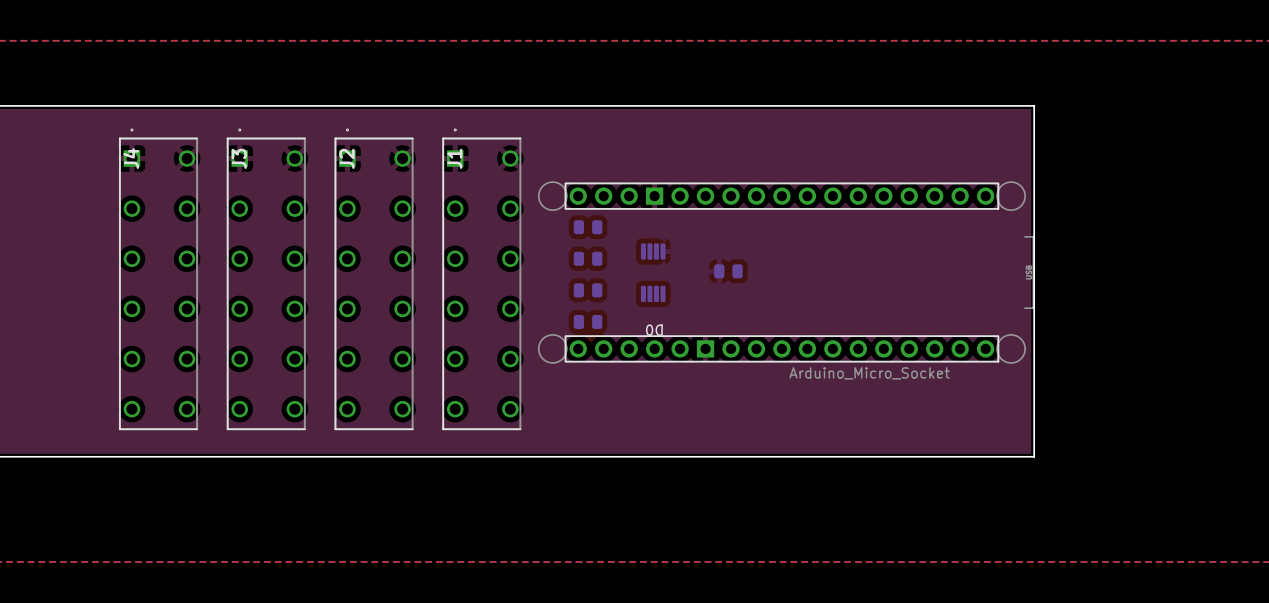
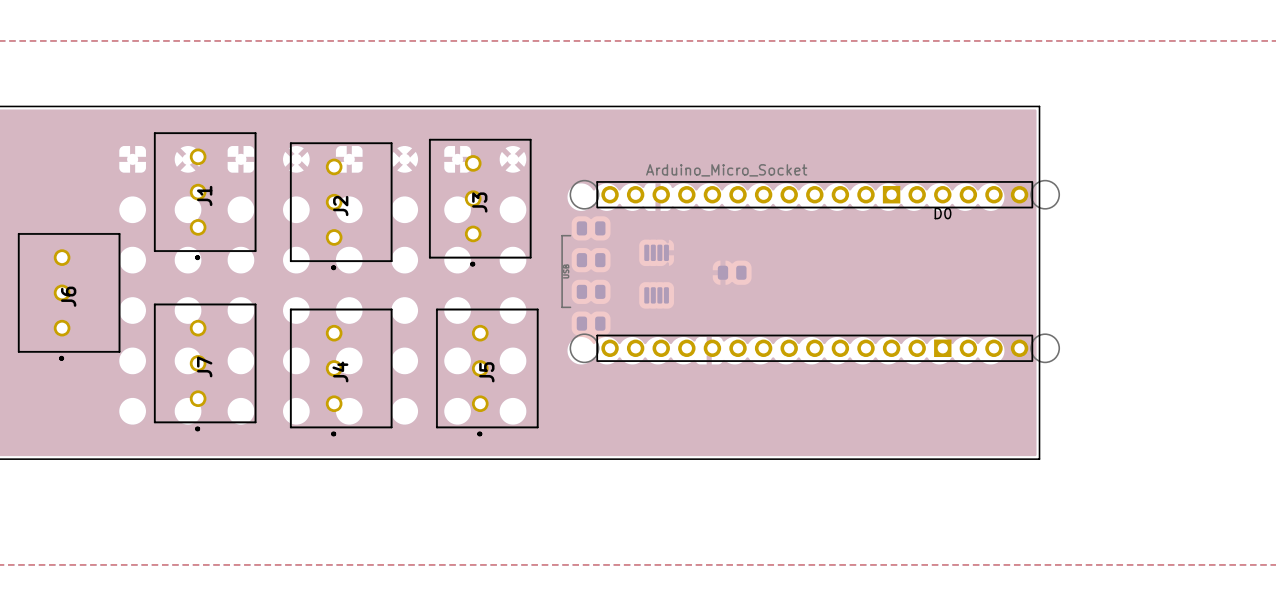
J4 footprint: [118, 128, 199, 431] -> [289, 308, 393, 437]
J3 footprint: [226, 128, 306, 431] -> [428, 138, 532, 267]
J2 footprint: [334, 128, 414, 431] -> [289, 142, 393, 271]
J1 footprint: [442, 128, 522, 431] -> [153, 132, 257, 261]
J4 name position: J4 (131, 158) -> J4 (340, 371)
J3 name position: J3 (239, 158) -> J3 (479, 202)
J2 name position: J2 (346, 158) -> J2 (340, 206)
J1 name position: J1 (454, 158) -> J1 (204, 195)
part rotation: 0° (786, 272) -> 180° (810, 271)
J6: none -> (69, 296)
J7: none -> (205, 367)
J5: none -> (487, 372)

